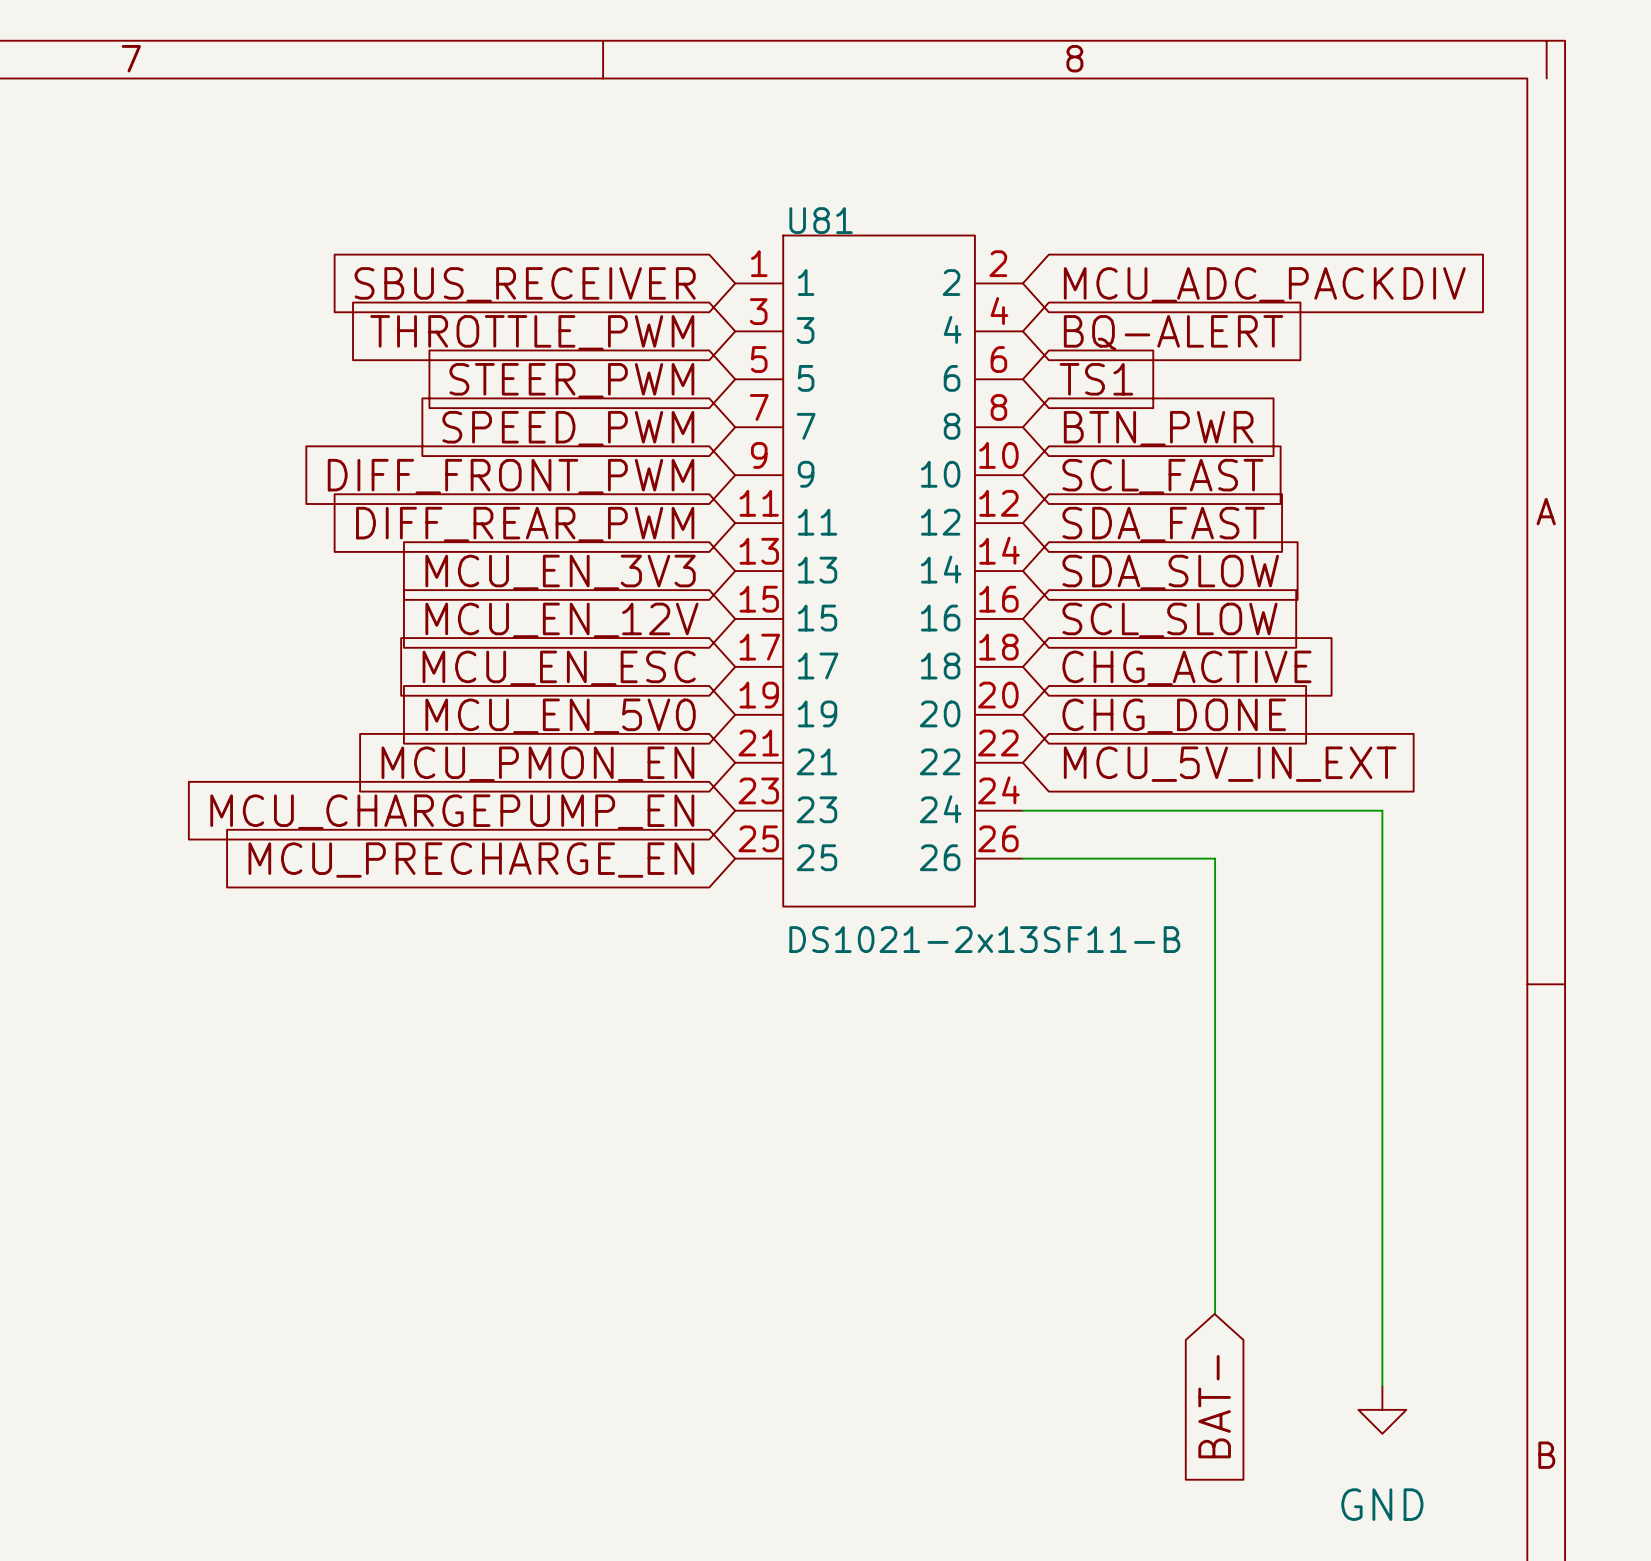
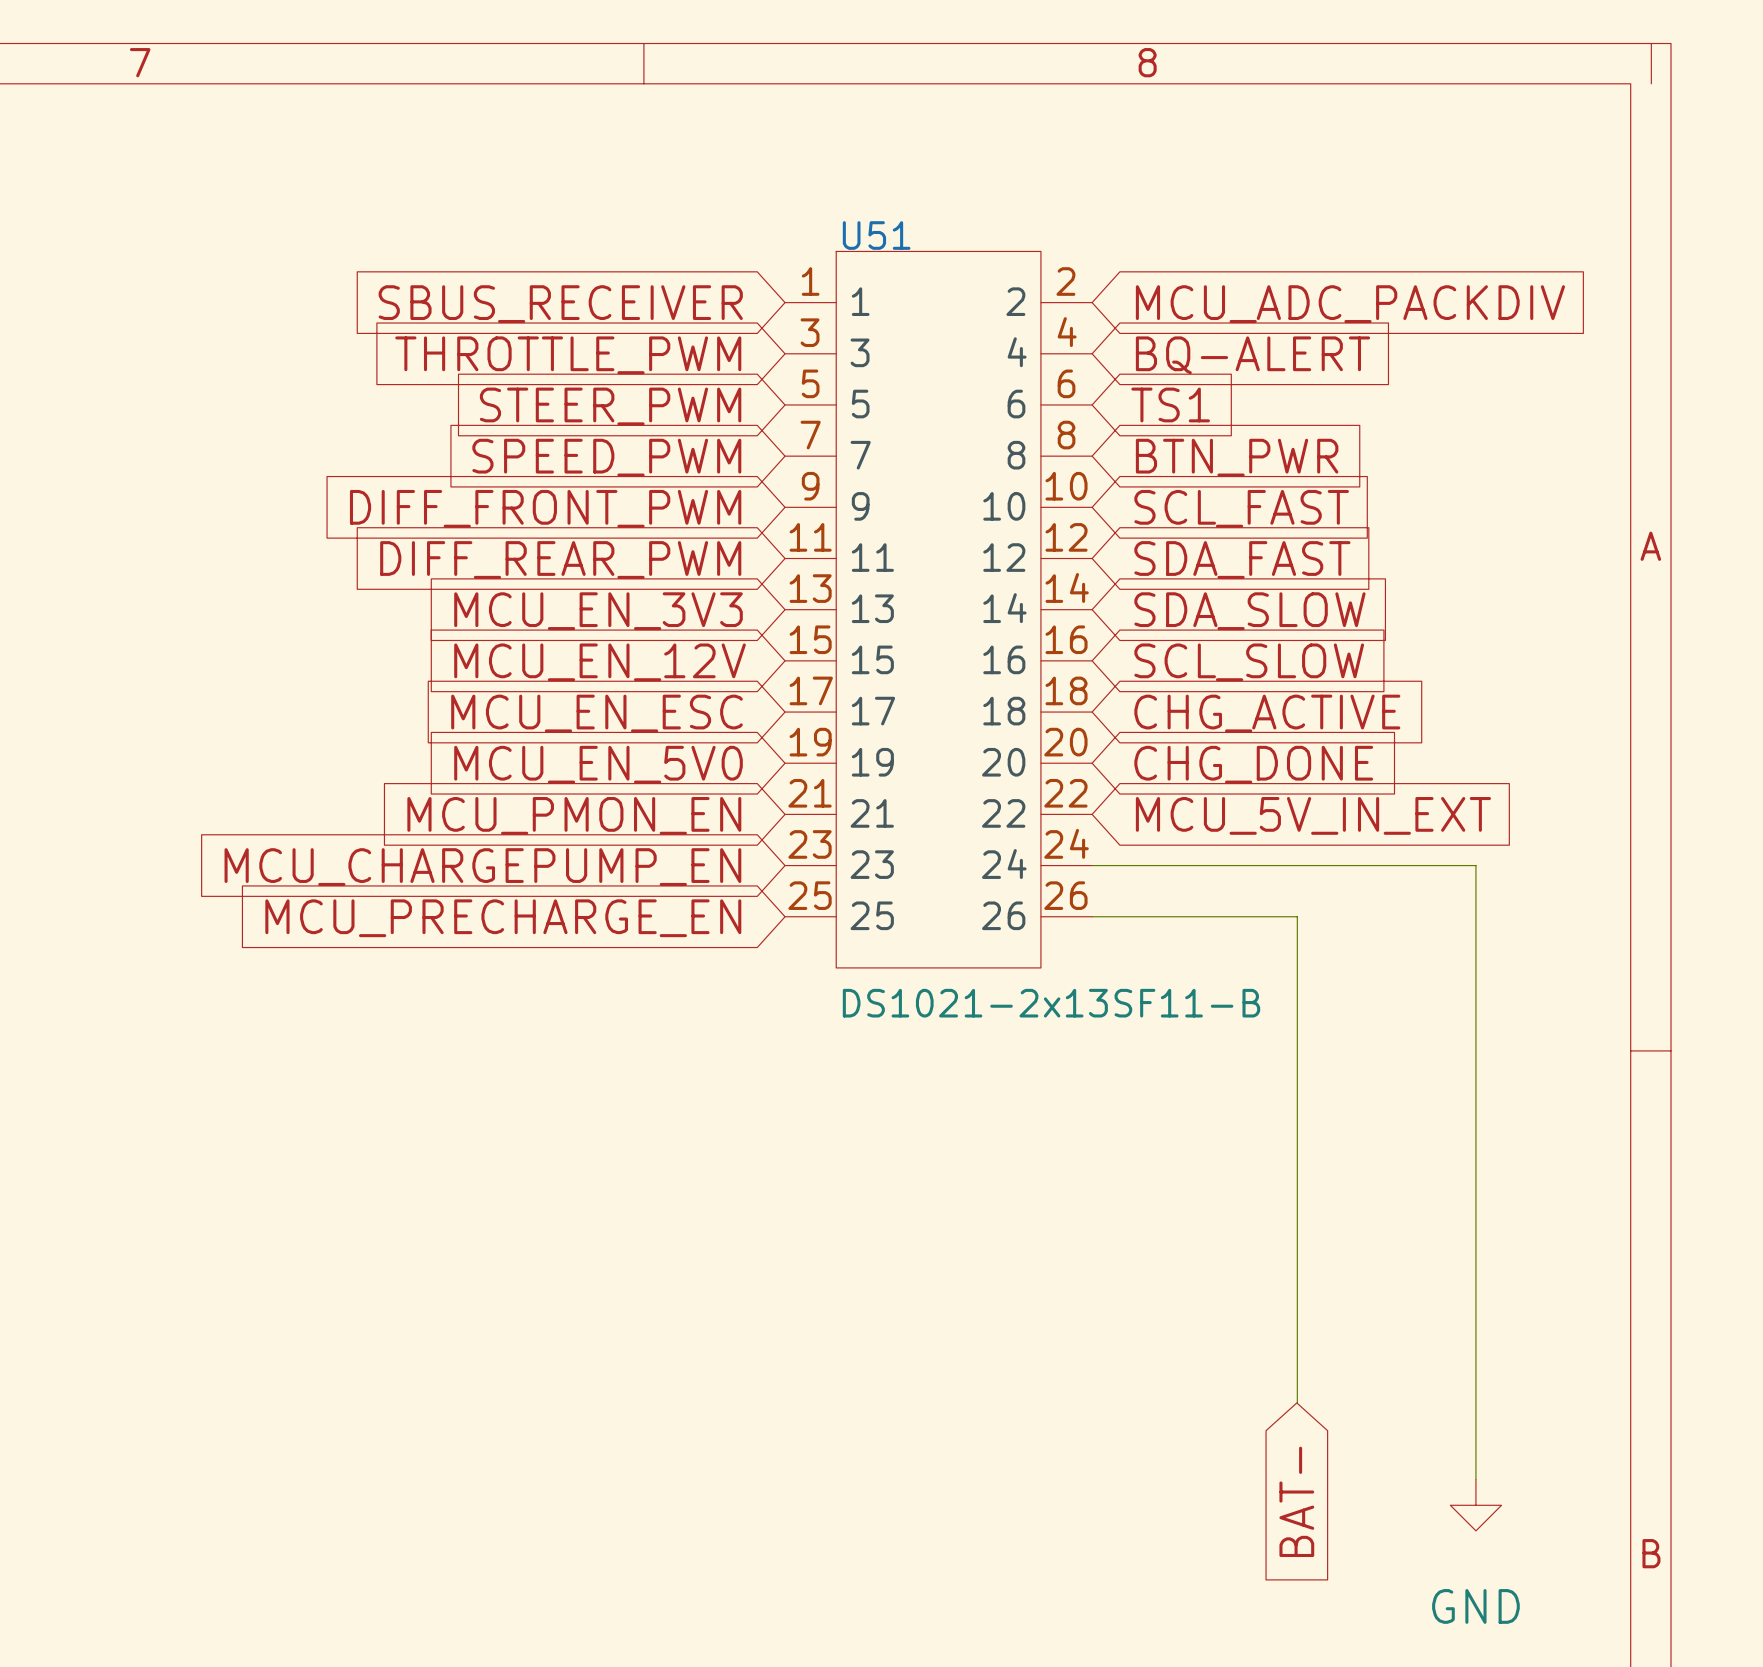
U81 name: U81 (821, 220) -> U51 (876, 235)

